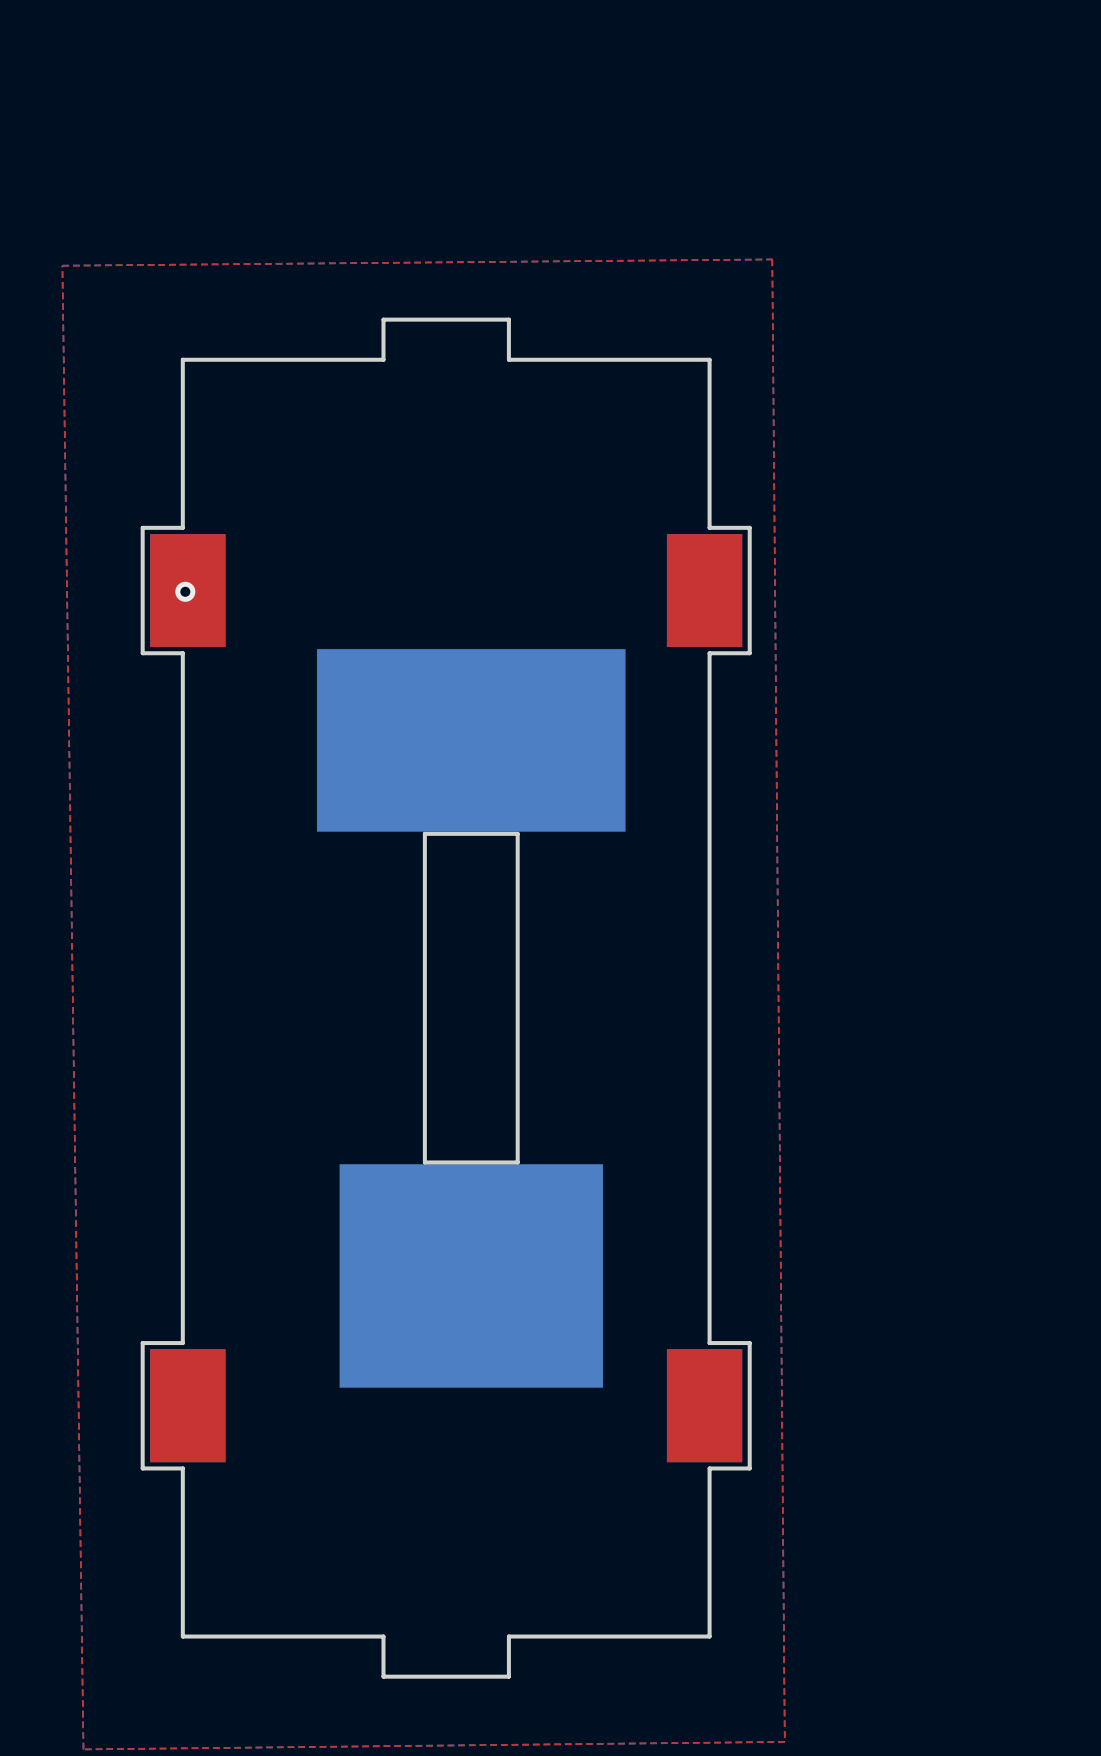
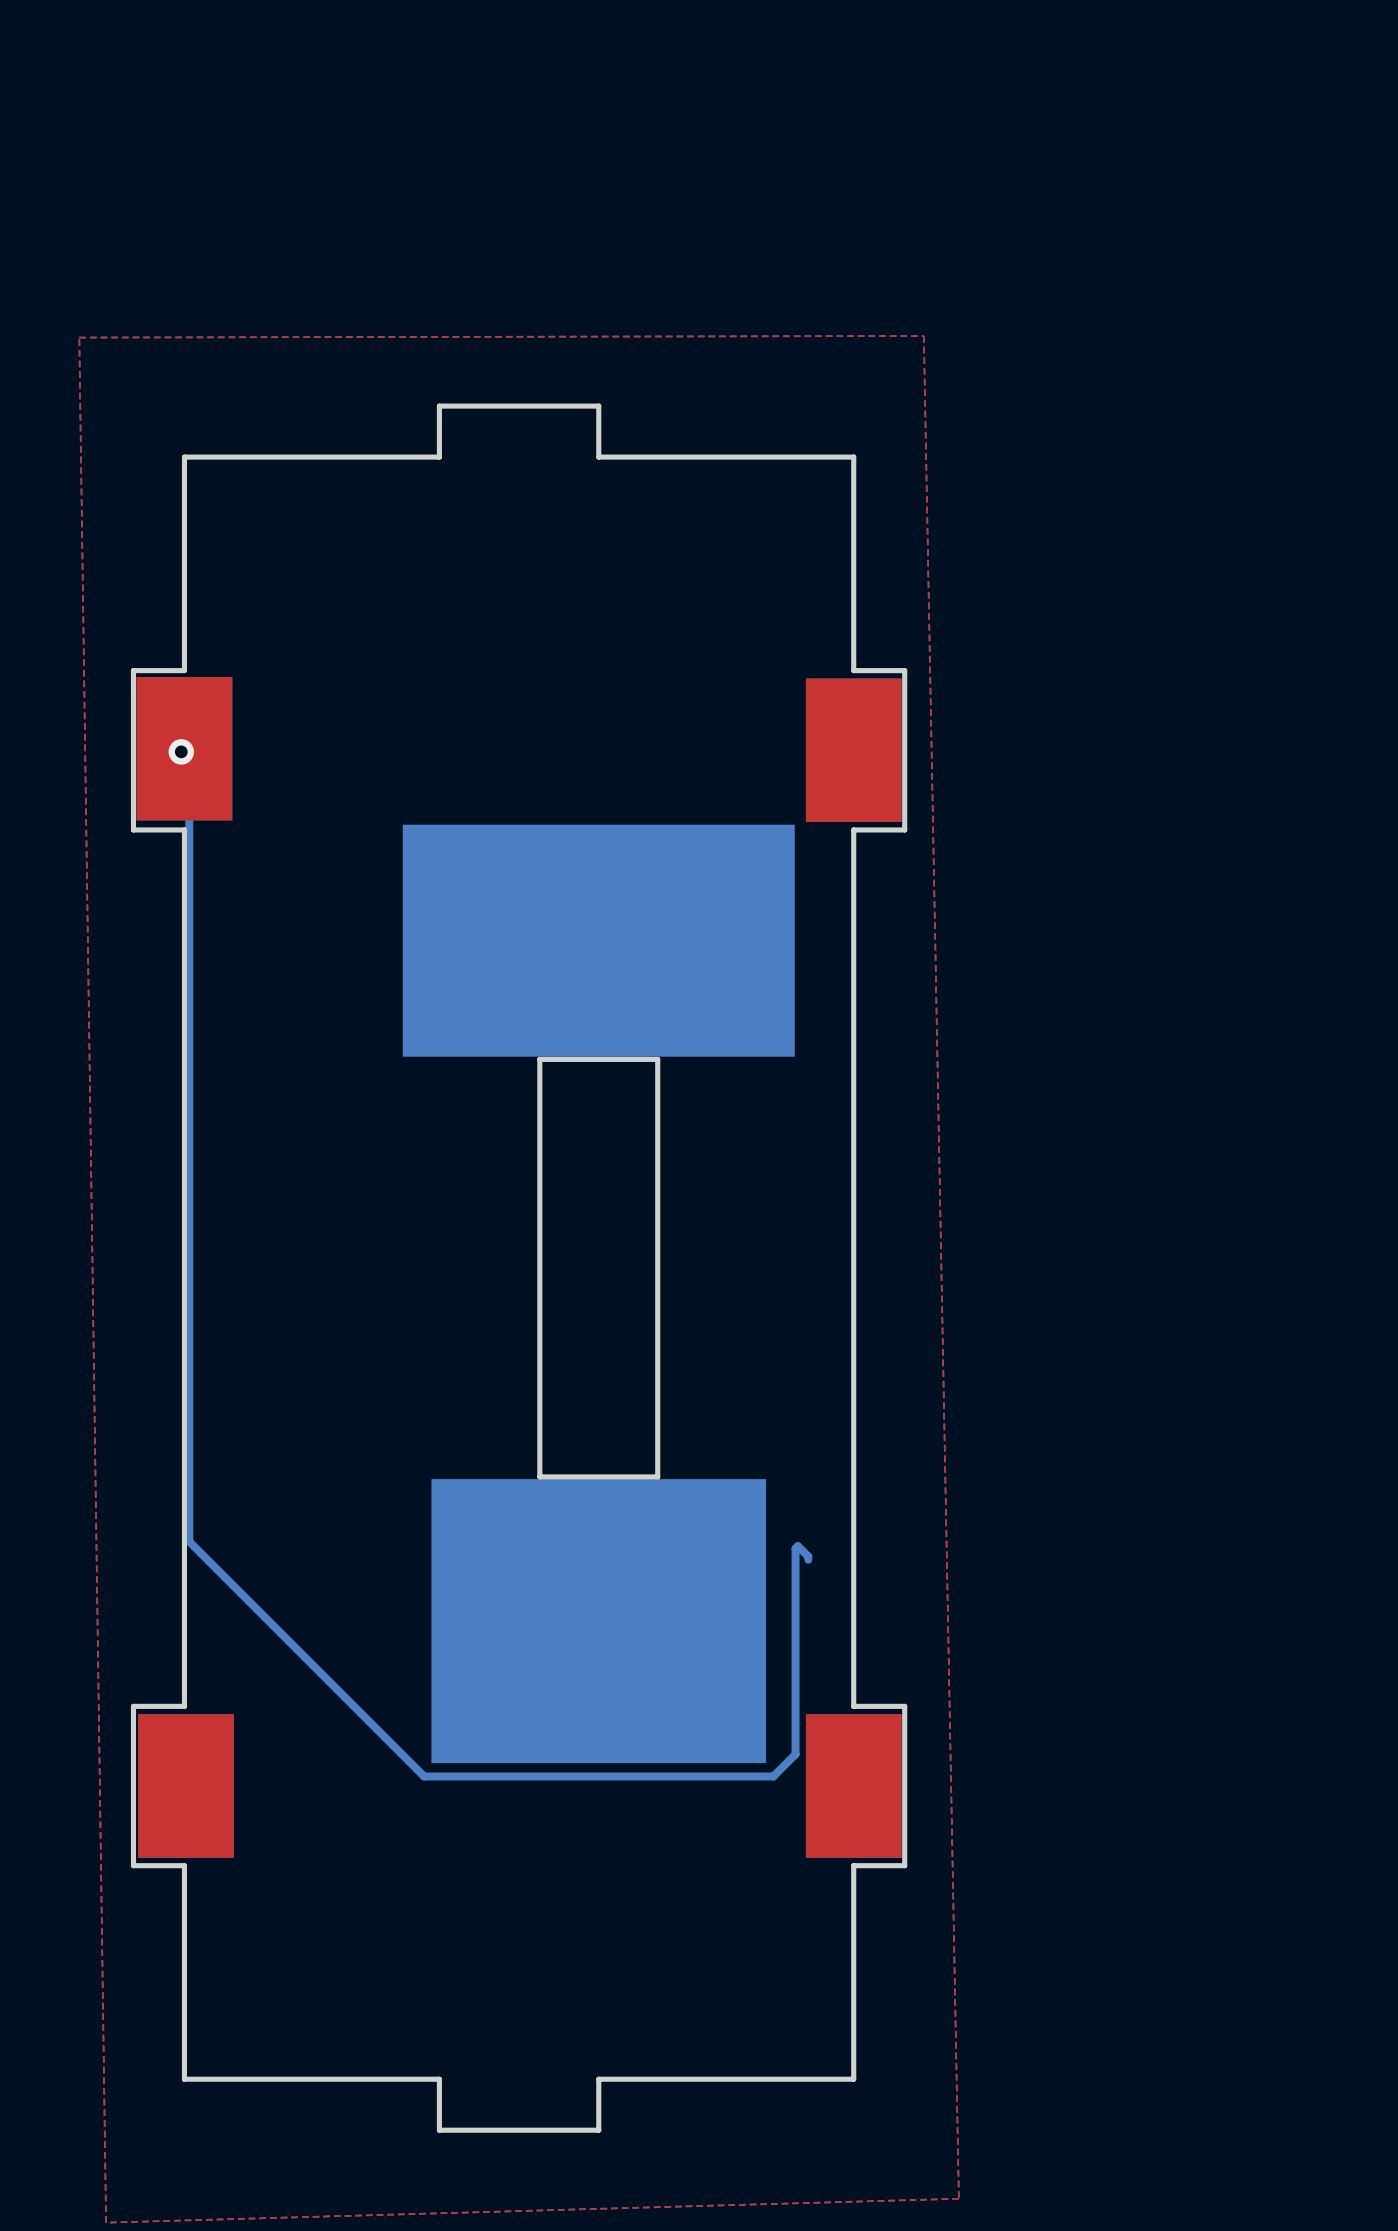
top zone outline: (62, 265) (772, 259) (784, 1741) (83, 1749) -> (79, 337) (923, 335) (958, 2198) (106, 2222)
board edge: (383, 319) (383, 359) (345, 359) -> (487, 406) (439, 406) (439, 457)
board edge: (471, 319) (508, 319) (508, 359) -> (598, 406) (598, 457) (646, 457)
board edge: (182, 359) (182, 527) (145, 527) -> (232, 457) (184, 457) (184, 670)
board edge: (671, 359) (709, 359) (709, 527) -> (853, 457) (853, 670) (901, 670)
board edge: (142, 527) (142, 653) -> (181, 670) (133, 670) (133, 829) (181, 829)
board edge: (712, 527) (749, 527) (749, 653) (712, 653) -> (904, 670) (904, 829)
bottom track: none -> (184, 748) (189, 753) (189, 1541) (424, 1776) (773, 1776) (795, 1754) (795, 1548) (797, 1546) (808, 1556) (808, 1559)
part position: (187, 590) -> (184, 748)
part position: (704, 590) -> (853, 750)
via position: (185, 591) -> (181, 751)
board edge: (145, 653) (182, 653) (182, 1343) (145, 1343) -> (184, 829) (184, 1706)
board edge: (709, 653) (709, 1343) -> (901, 829) (853, 829) (853, 1706) (901, 1706)
board edge: (142, 1343) (142, 1468) -> (181, 1706) (133, 1706) (133, 1865) (181, 1865)
board edge: (712, 1343) (749, 1343) (749, 1468) (712, 1468) -> (904, 1706) (904, 1865)
part position: (187, 1405) -> (186, 1786)
part position: (704, 1405) -> (853, 1786)
board edge: (145, 1468) (182, 1468) (182, 1636) -> (184, 1865) (184, 2079) (232, 2079)
board edge: (709, 1468) (709, 1636) (671, 1636) -> (901, 1865) (853, 1865) (853, 2079)
board edge: (345, 1636) (383, 1636) (383, 1676) -> (439, 2079) (439, 2130) (487, 2130)
board edge: (508, 1636) (508, 1676) (471, 1676) -> (646, 2079) (598, 2079) (598, 2130)

